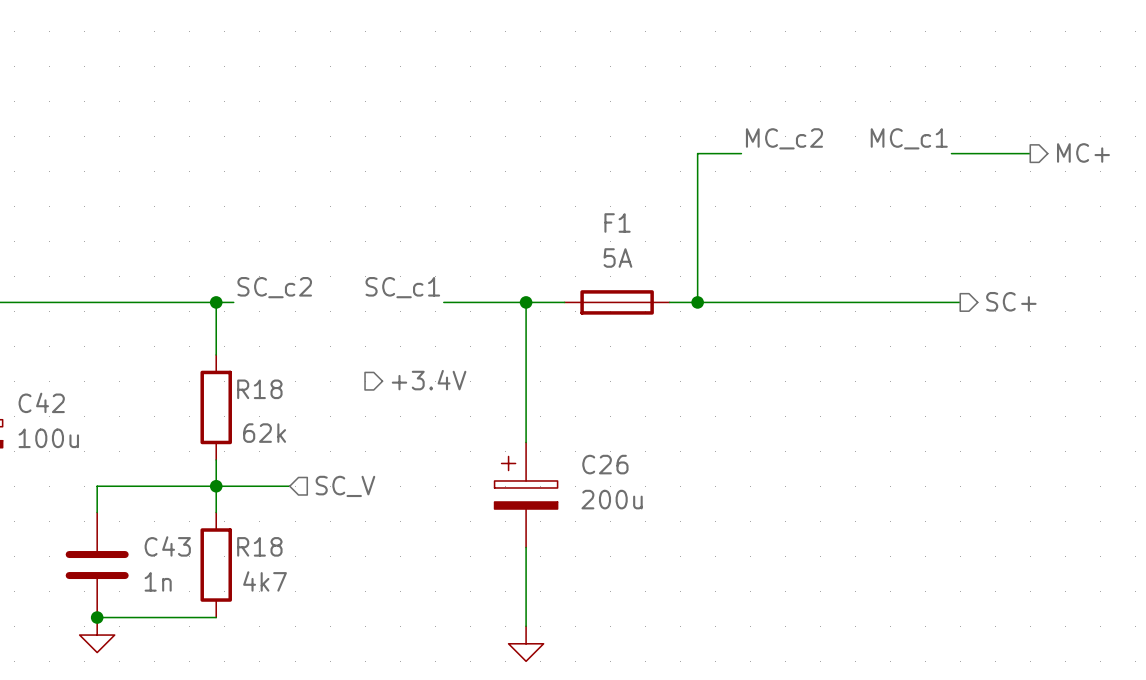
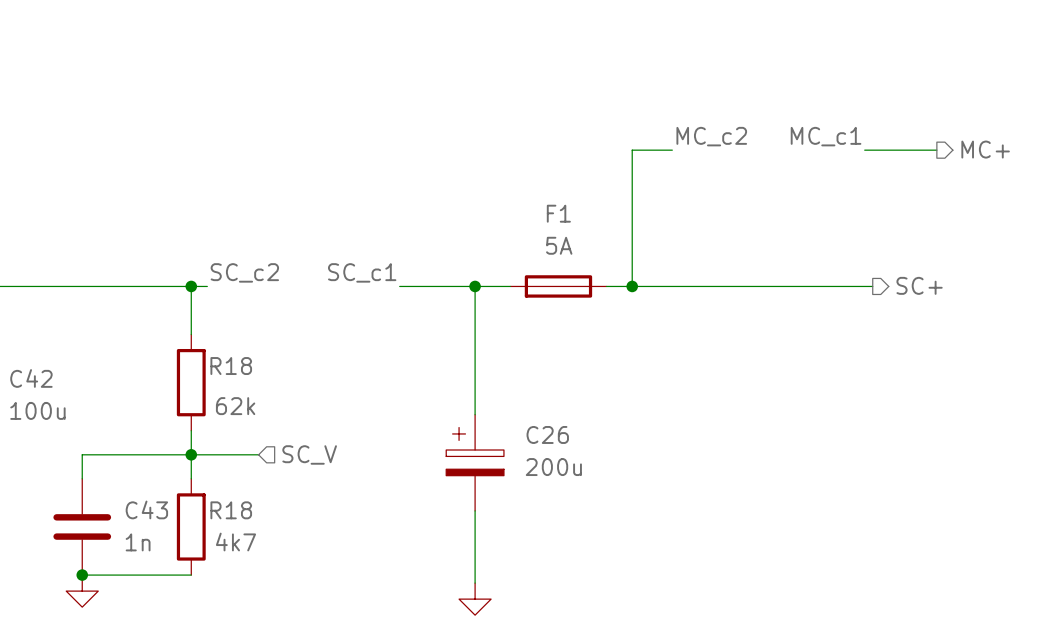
hierarchical label: +3.4V (429, 380) -> none

